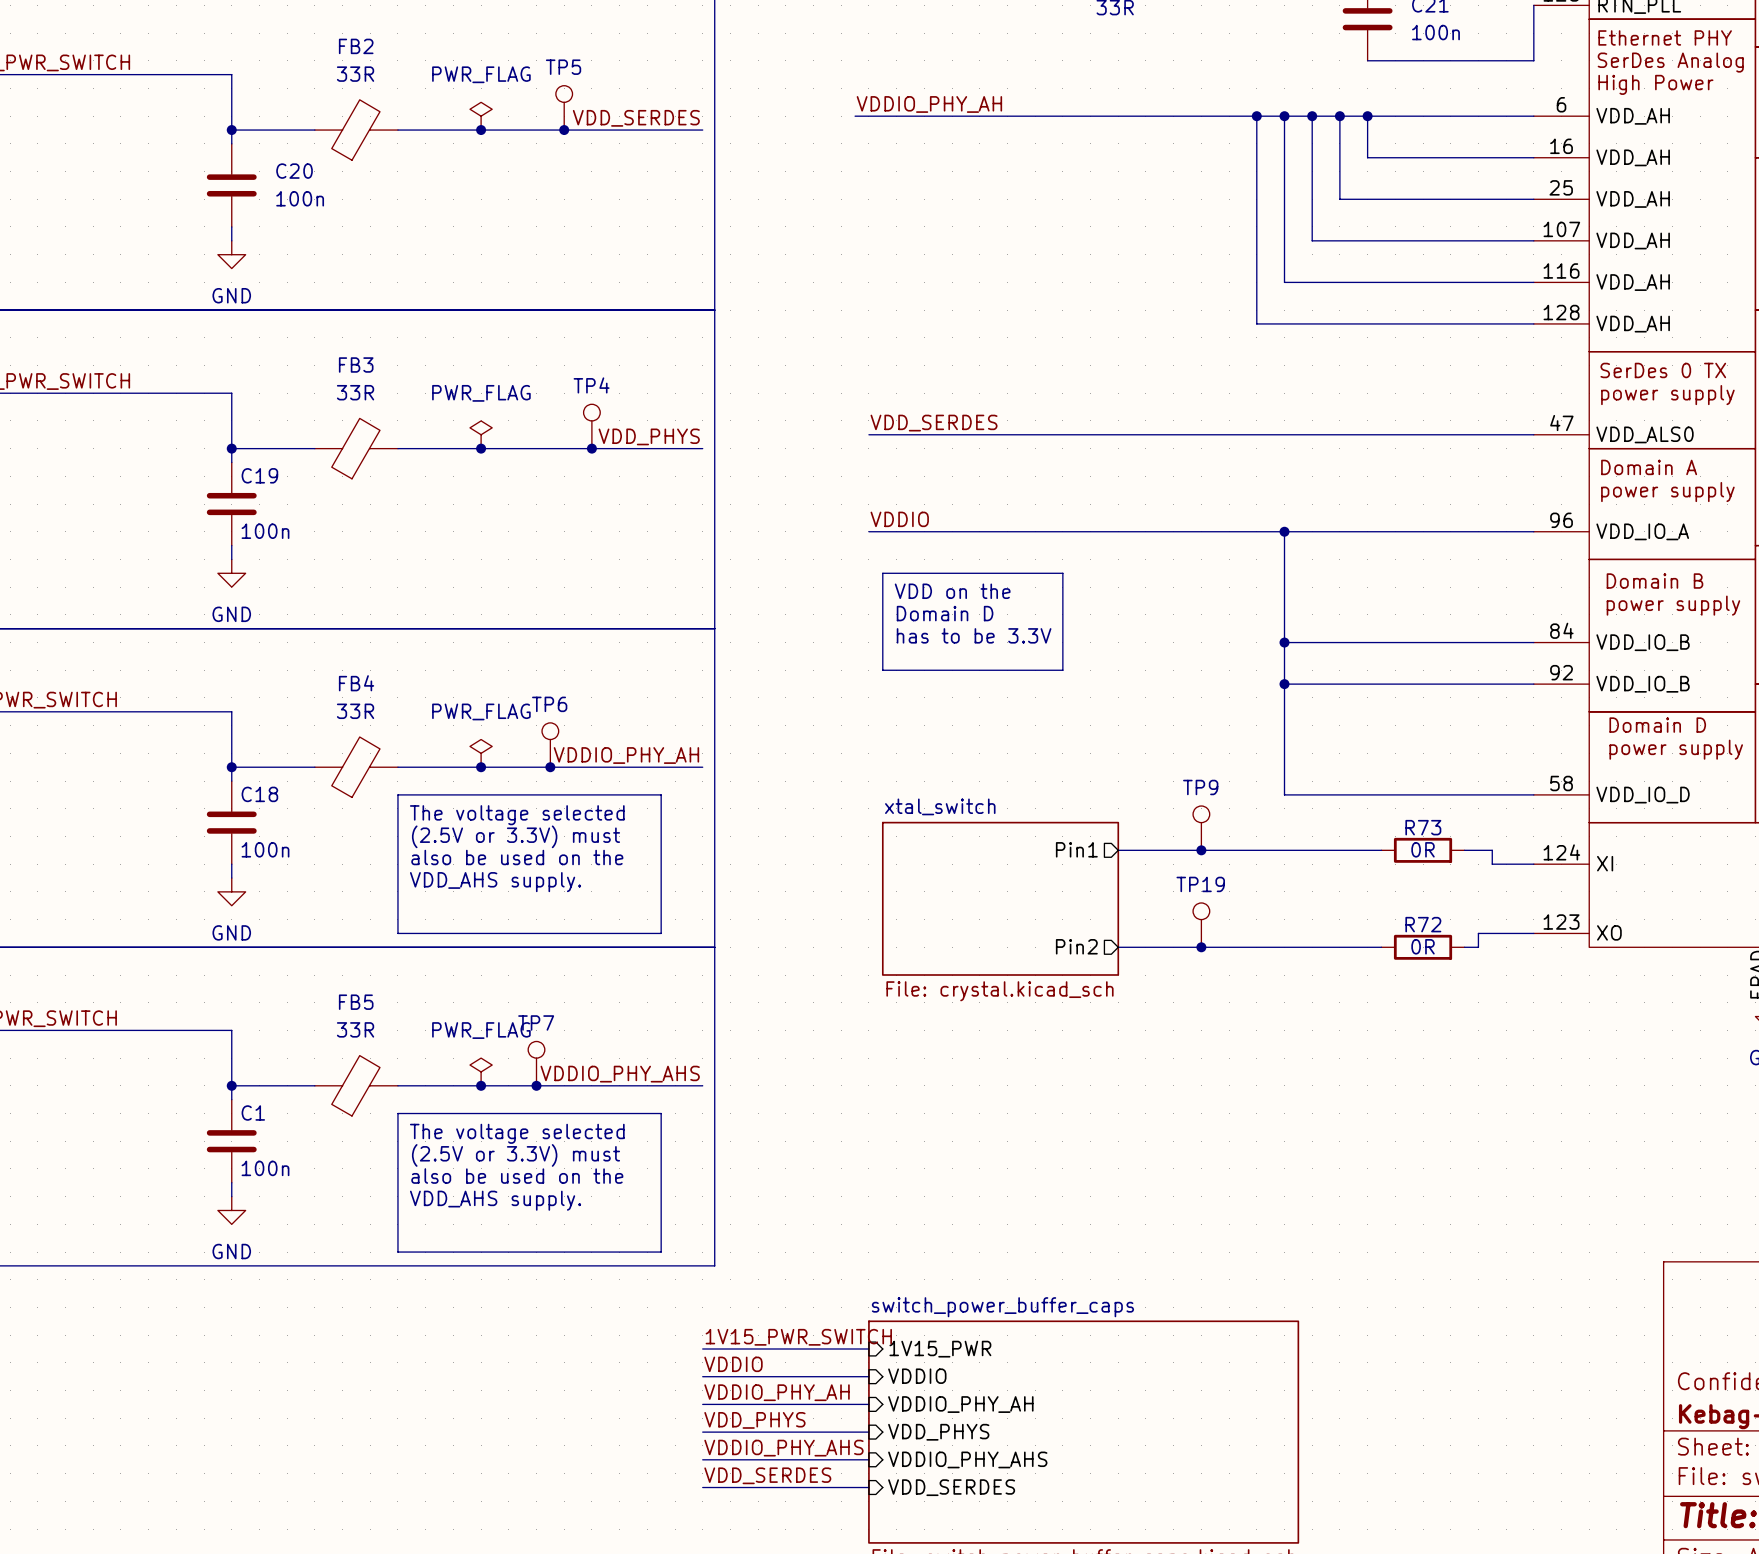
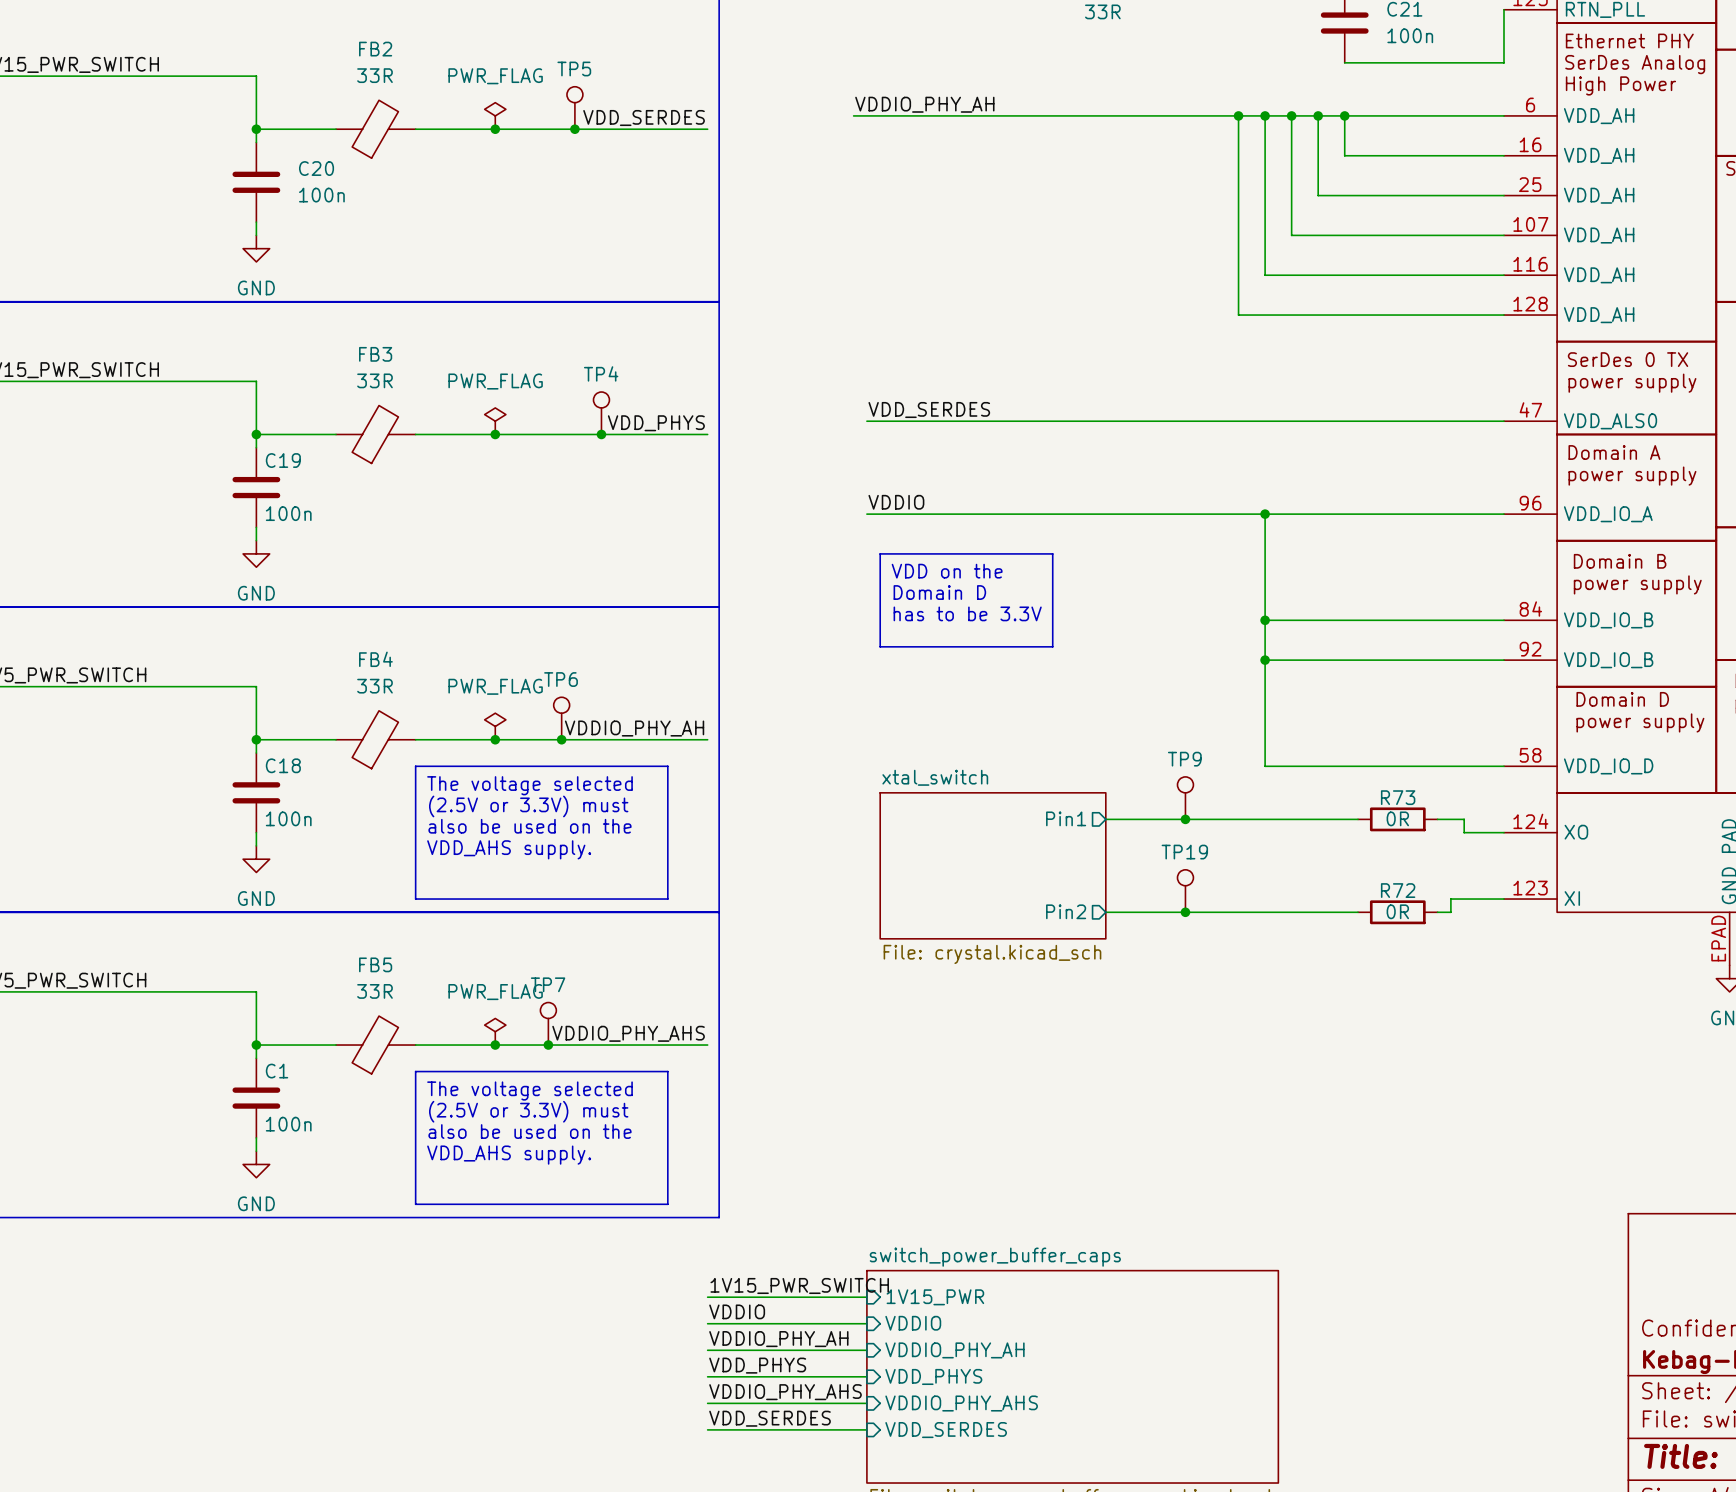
part pin name: XI (1605, 863) -> XO (1576, 832)
part pin name: XO (1609, 932) -> XI (1572, 898)

